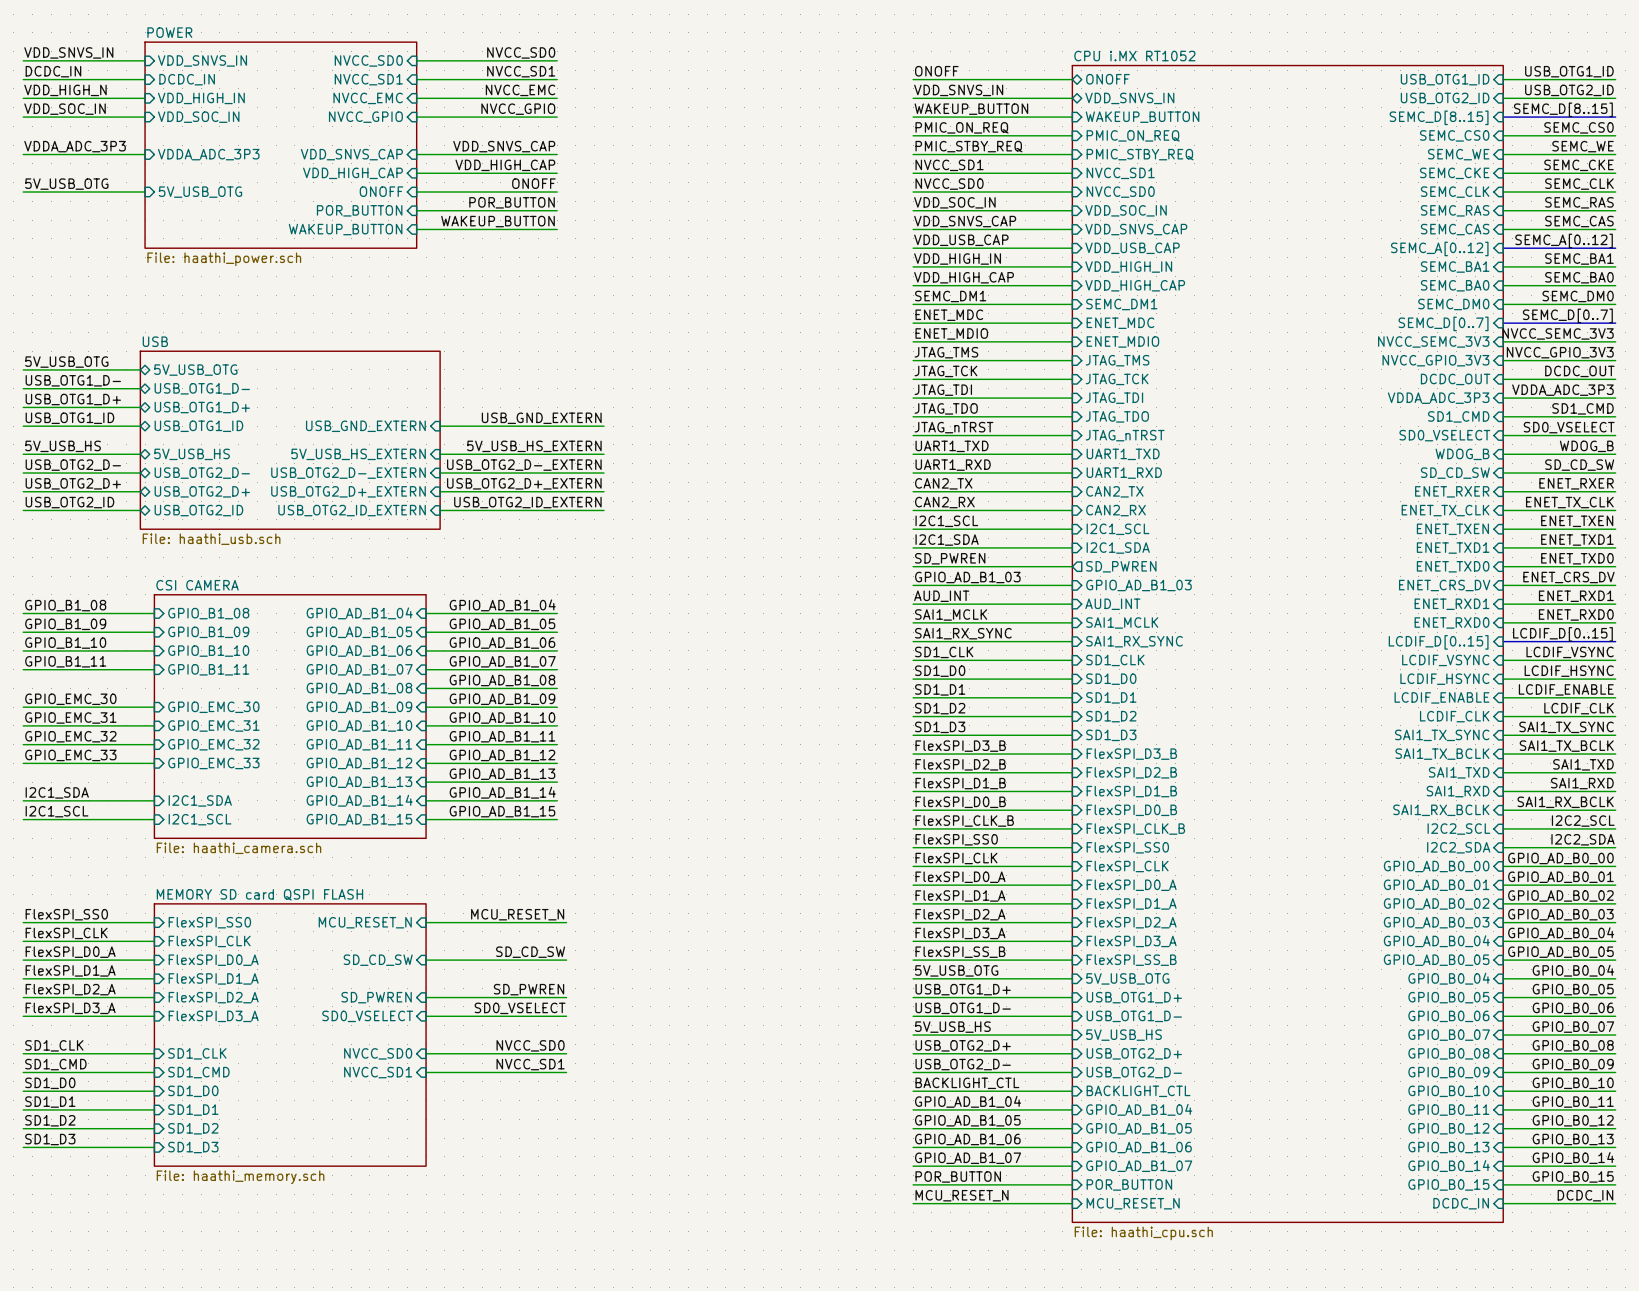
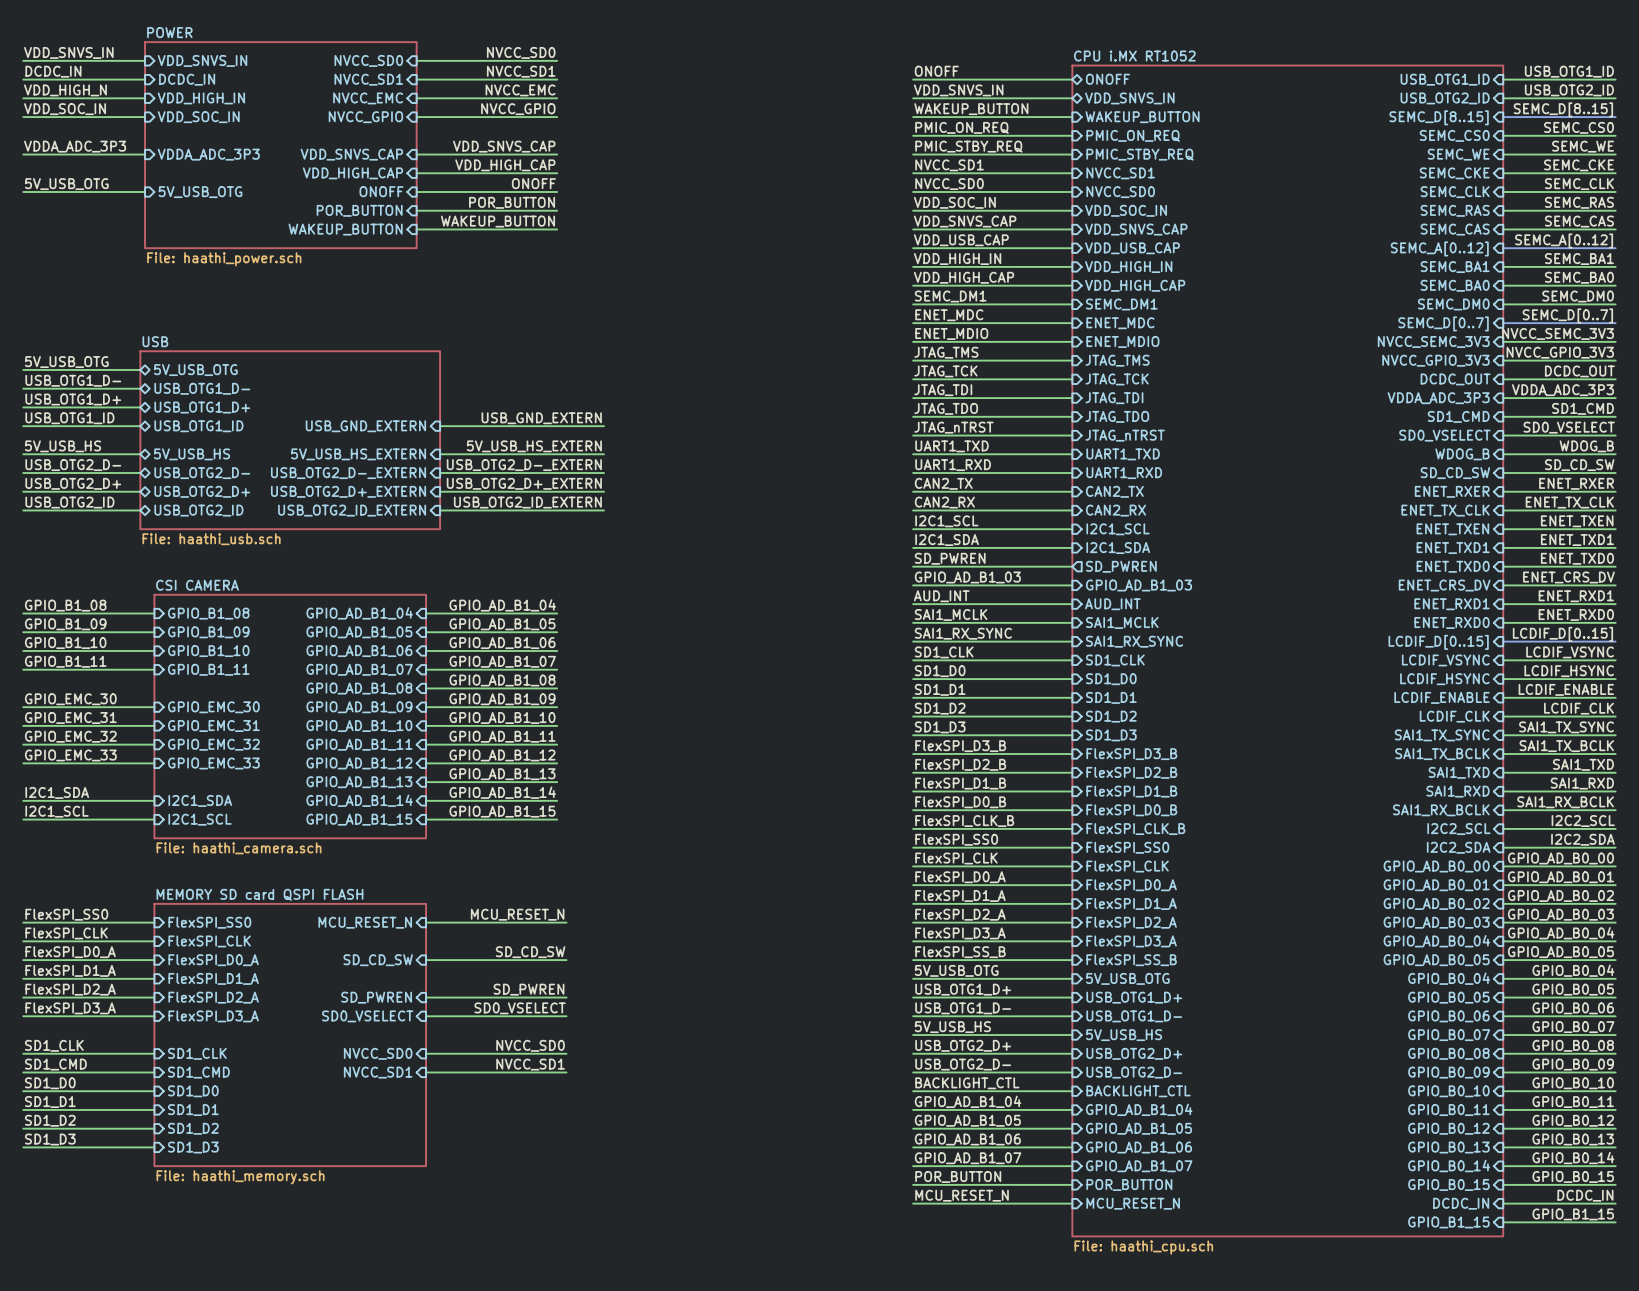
sheet CPU i.MX RT1052 shape: [1072, 65, 1504, 1223] -> [1072, 65, 1504, 1237]
label: none -> GPIO_B1_15 (1573, 1214)
sheet pin: none -> GPIO_B1_15 (1448, 1222)
wire: none -> (1503, 1222) (1615, 1222)

